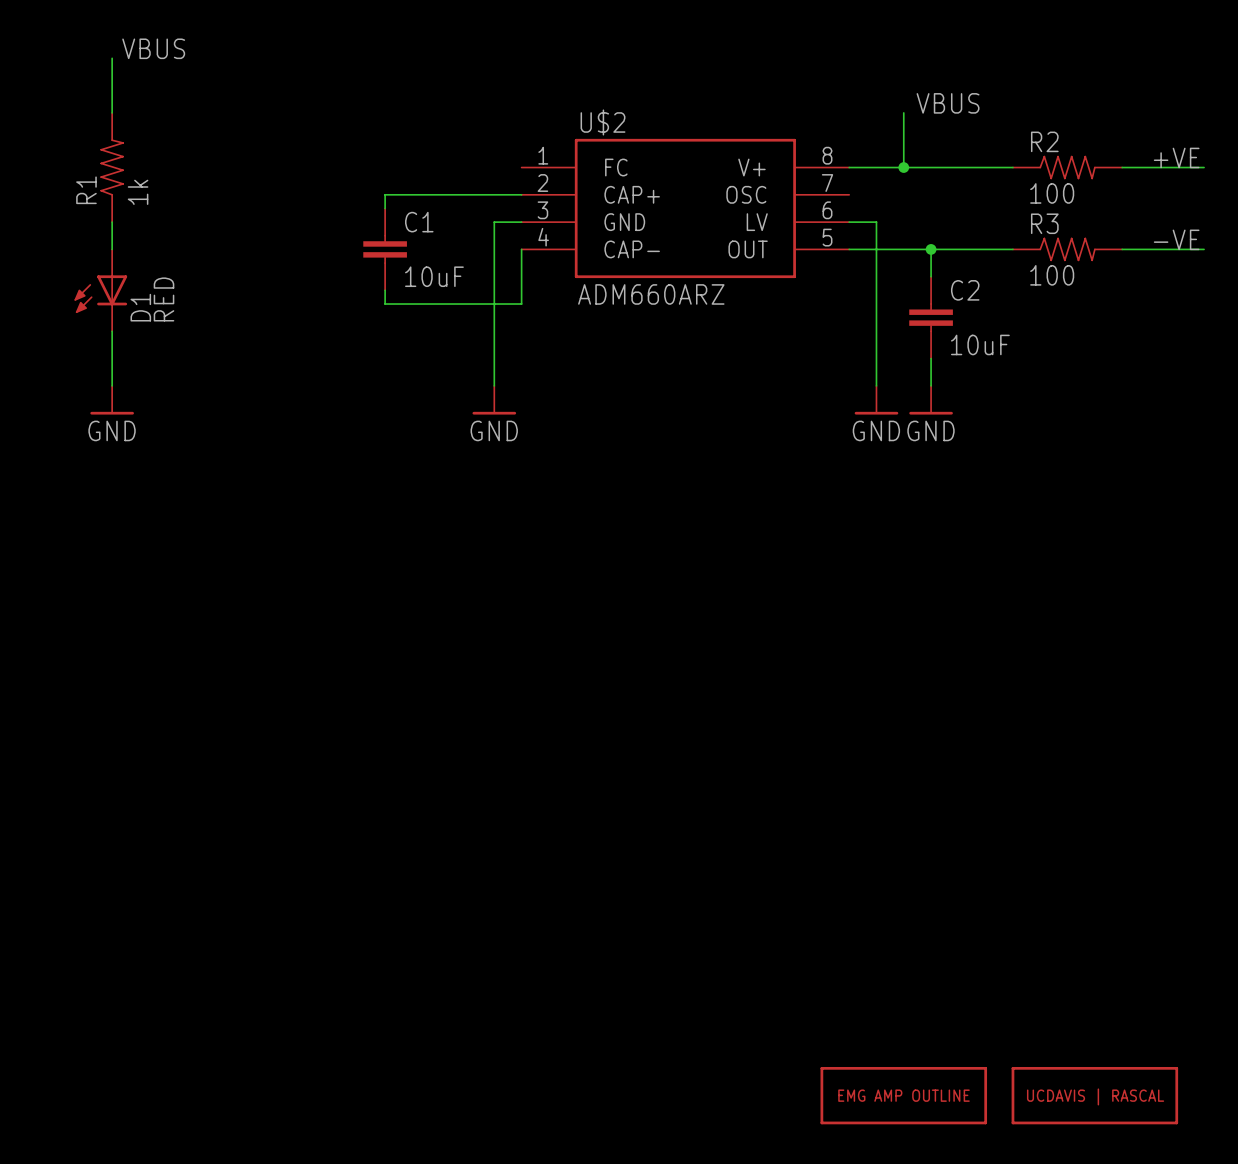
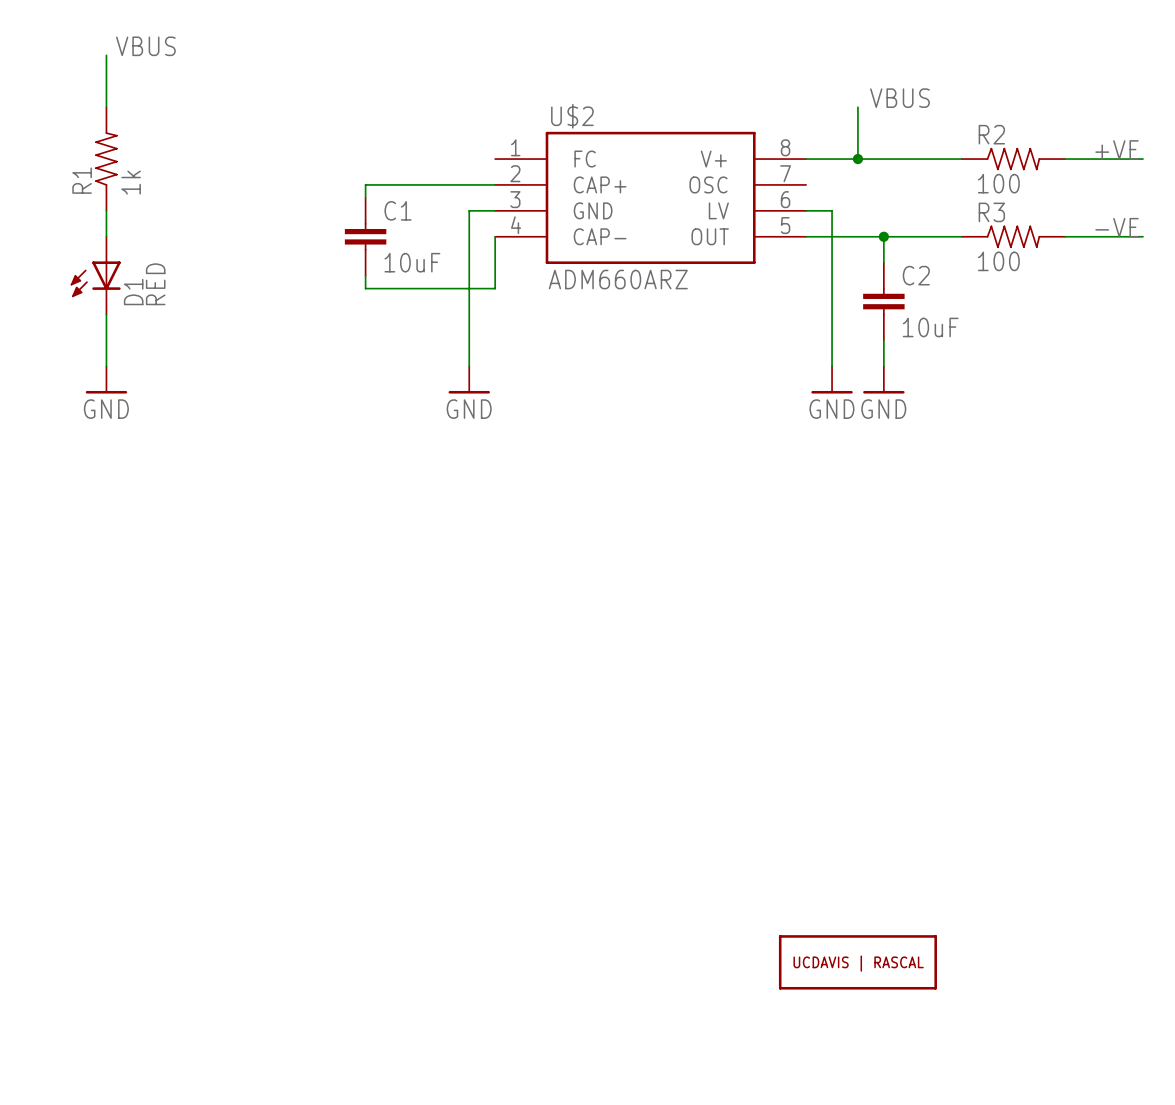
part: (903, 1095) -> none
part position: (1094, 1095) -> (857, 962)

